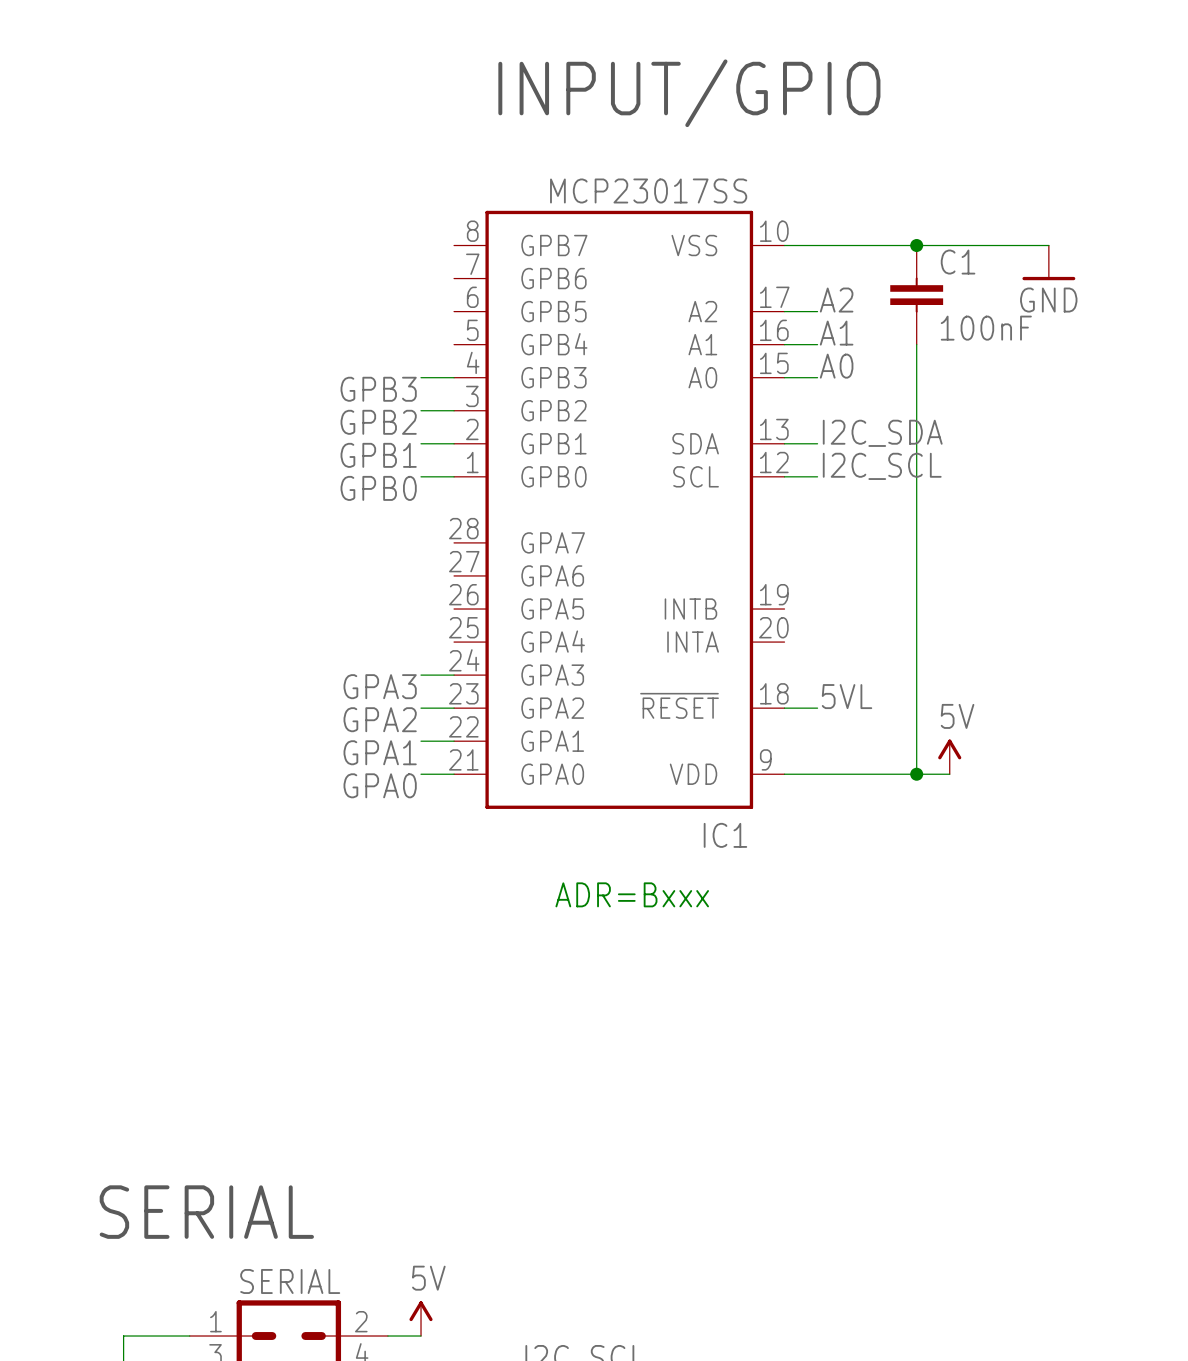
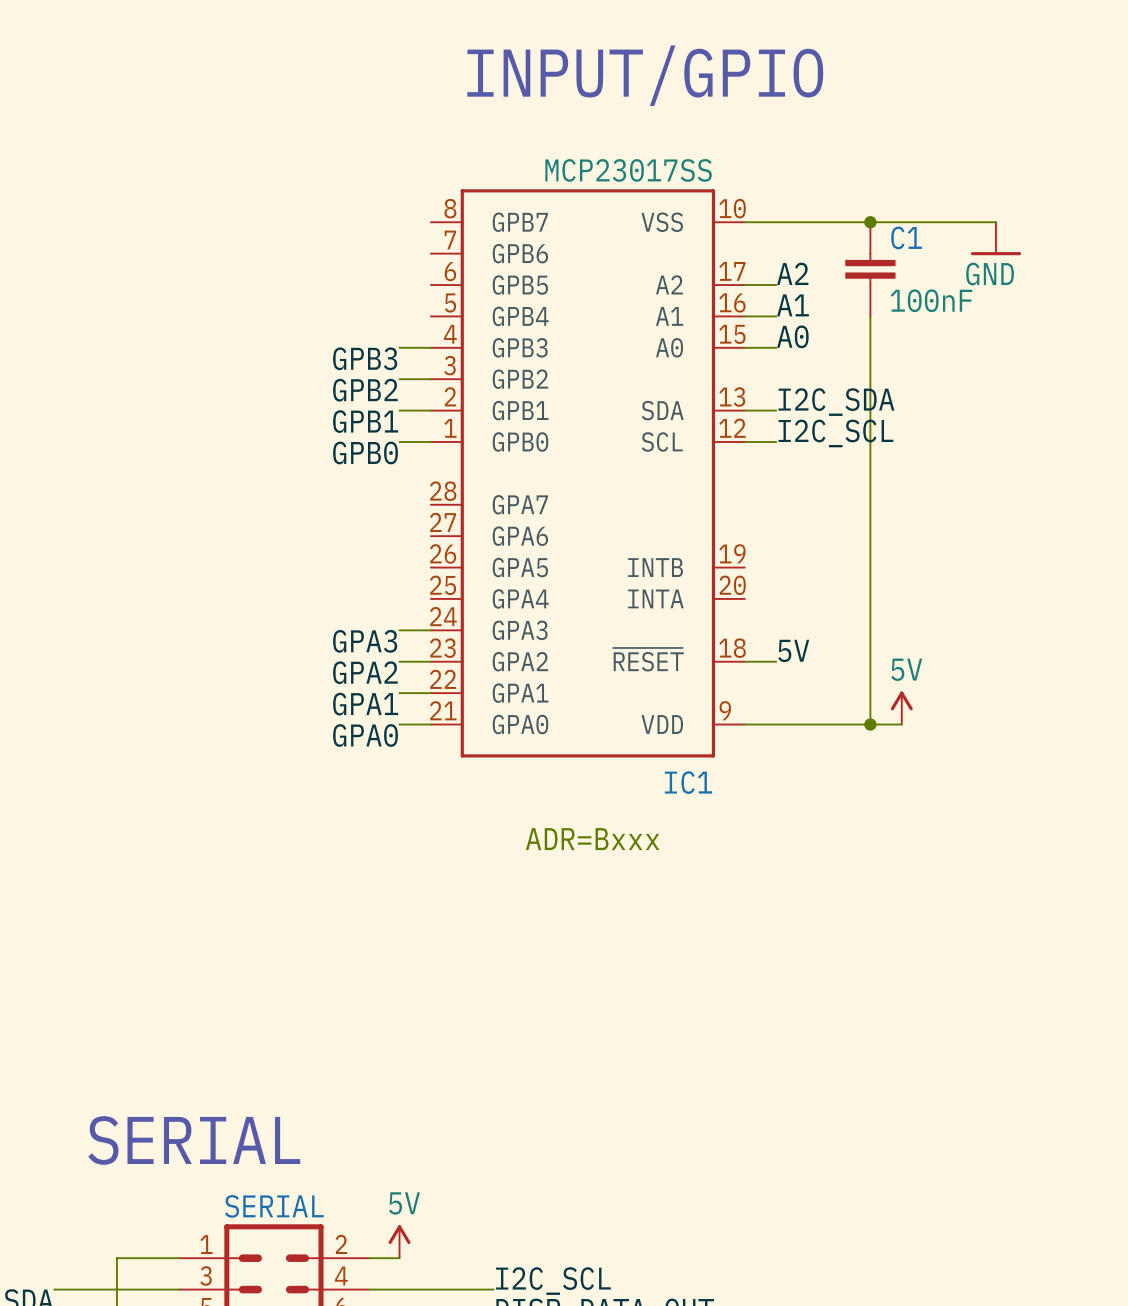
label: 5VL (847, 696) -> 5V (793, 650)

